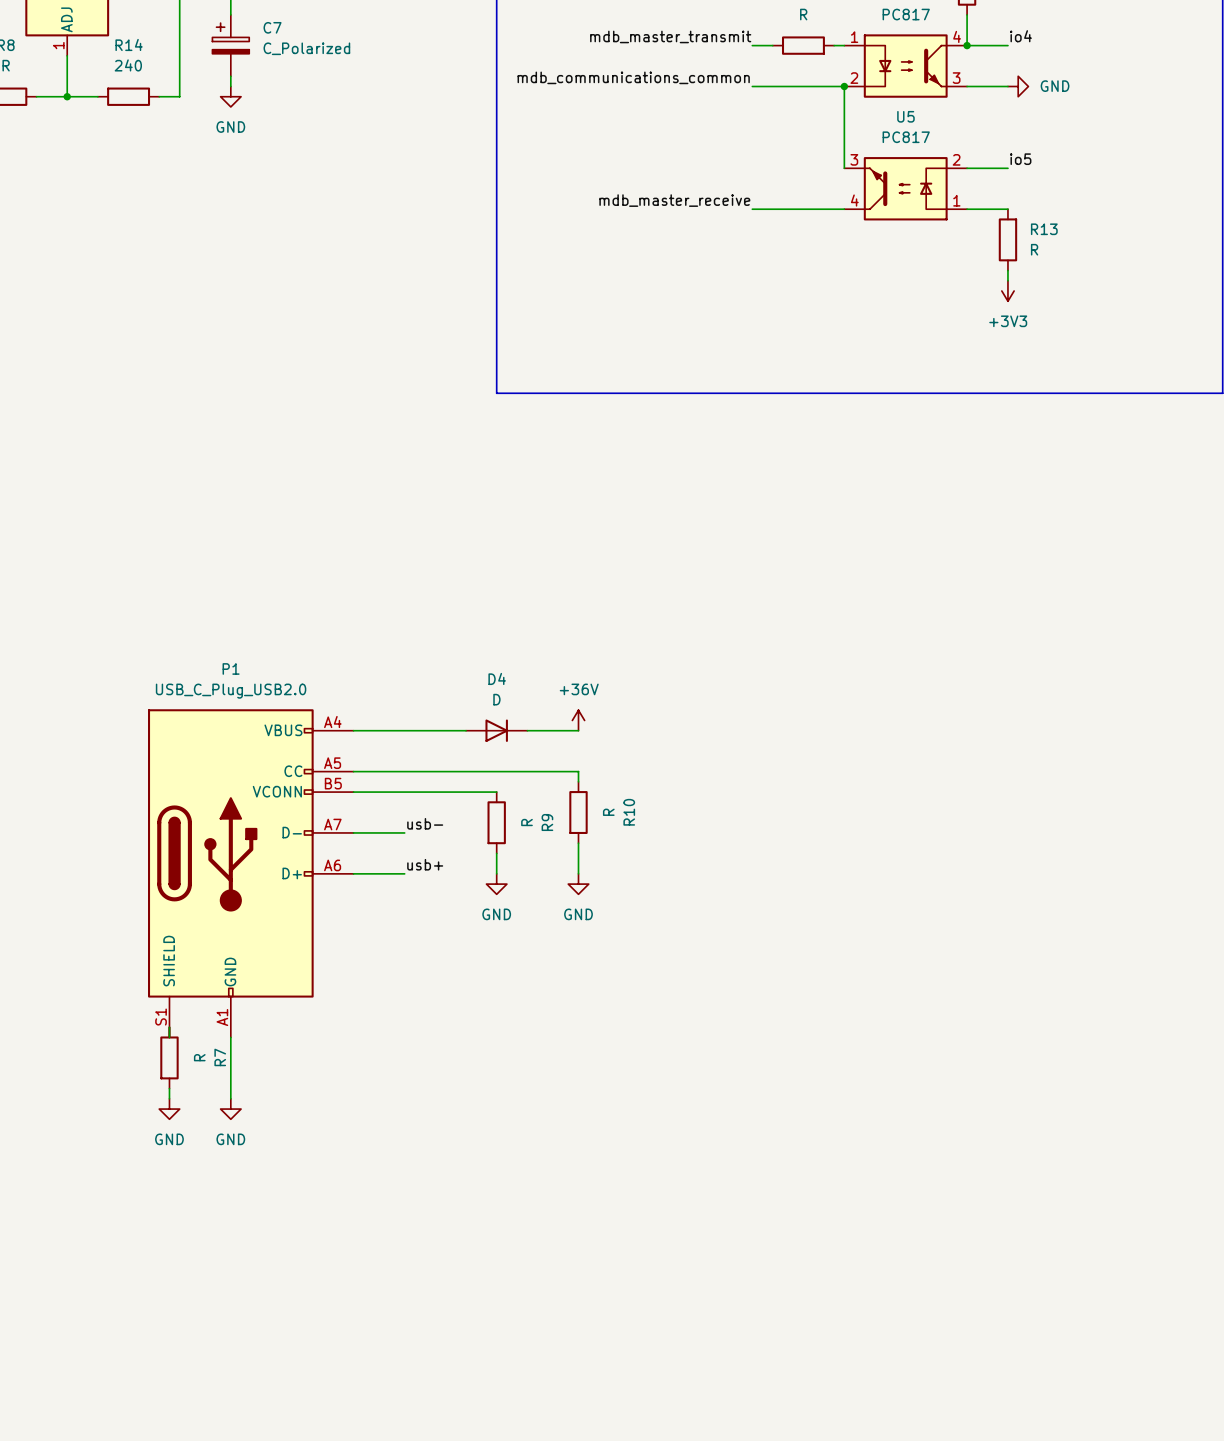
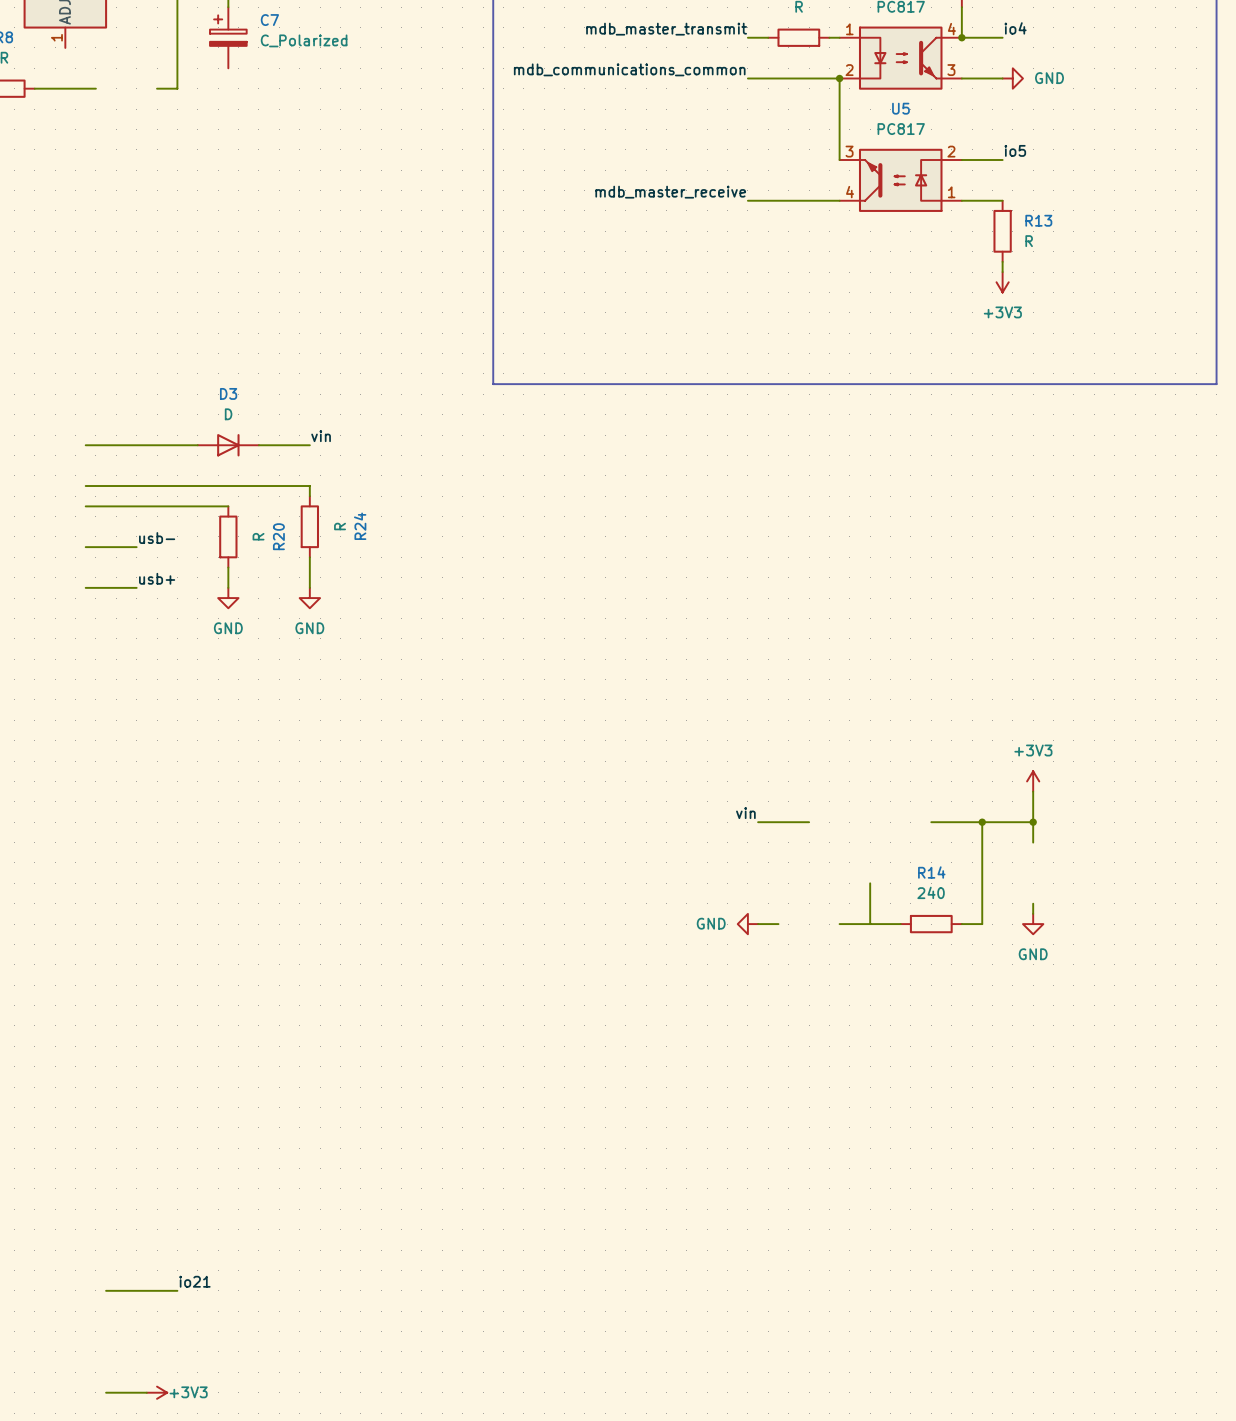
wire: (67, 55) (67, 96) -> none
wire: (230, 76) (230, 86) -> none
junction: (67, 96) -> none
R14 position: (128, 96) -> (931, 924)
power symbol: GND (230, 96) -> none
label: none -> vin (321, 436)
wire: none -> (85, 445) (197, 445)
D3: none -> D (228, 445)
wire: none -> (258, 445) (309, 445)
wire: none -> (85, 486) (309, 486) (309, 496)
wire: none -> (85, 506) (228, 506)
R24: none -> R (309, 526)
R20: none -> R (228, 536)
label: none -> usb- (157, 538)
wire: none -> (85, 547) (136, 547)
wire: none -> (309, 557) (309, 587)
wire: none -> (228, 567) (228, 587)
label: none -> usb+ (157, 578)
wire: none -> (85, 587) (136, 587)
power symbol: none -> GND (228, 598)
power symbol: none -> GND (309, 598)
power symbol: +36V (578, 720) -> none
wire: (353, 730) (466, 730) -> none
D4: D (496, 730) -> none
wire: (527, 730) (578, 730) -> none
wire: (353, 771) (578, 771) (578, 781) -> none
wire: (353, 792) (496, 792) -> none
power symbol: none -> +3V3 (1033, 781)
wire: none -> (1033, 791) (1033, 842)
R10: R (578, 812) -> none
R9: R (496, 822) -> none
label: usb- (425, 823) -> none
label: none -> vin (745, 813)
wire: (353, 832) (404, 832) -> none
wire: none -> (758, 822) (809, 822)
wire: none -> (931, 822) (1033, 822)
wire: none -> (982, 822) (982, 924) (961, 924)
junction: none -> (982, 822)
junction: none -> (1033, 822)
wire: (578, 843) (578, 873) -> none
wire: (496, 853) (496, 873) -> none
label: usb+ (425, 864) -> none
P1: USB_C_Plug_USB2.0 (250, 873) -> none
wire: (353, 873) (404, 873) -> none
power symbol: GND (496, 884) -> none
power symbol: GND (578, 884) -> none
wire: none -> (870, 883) (870, 924)
wire: none -> (1033, 903) (1033, 913)
power symbol: none -> GND (747, 924)
wire: none -> (758, 924) (778, 924)
wire: none -> (839, 924) (900, 924)
power symbol: none -> GND (1033, 924)
wire: (169, 1027) (169, 1037) -> none
wire: (230, 1037) (230, 1098) -> none
R7: R (169, 1057) -> none
wire: (169, 1088) (169, 1098) -> none
power symbol: GND (169, 1109) -> none
power symbol: GND (230, 1109) -> none
label: none -> io21 (194, 1281)
wire: none -> (106, 1290) (177, 1290)
wire: none -> (106, 1392) (146, 1392)
power symbol: none -> +3V3 (157, 1392)

